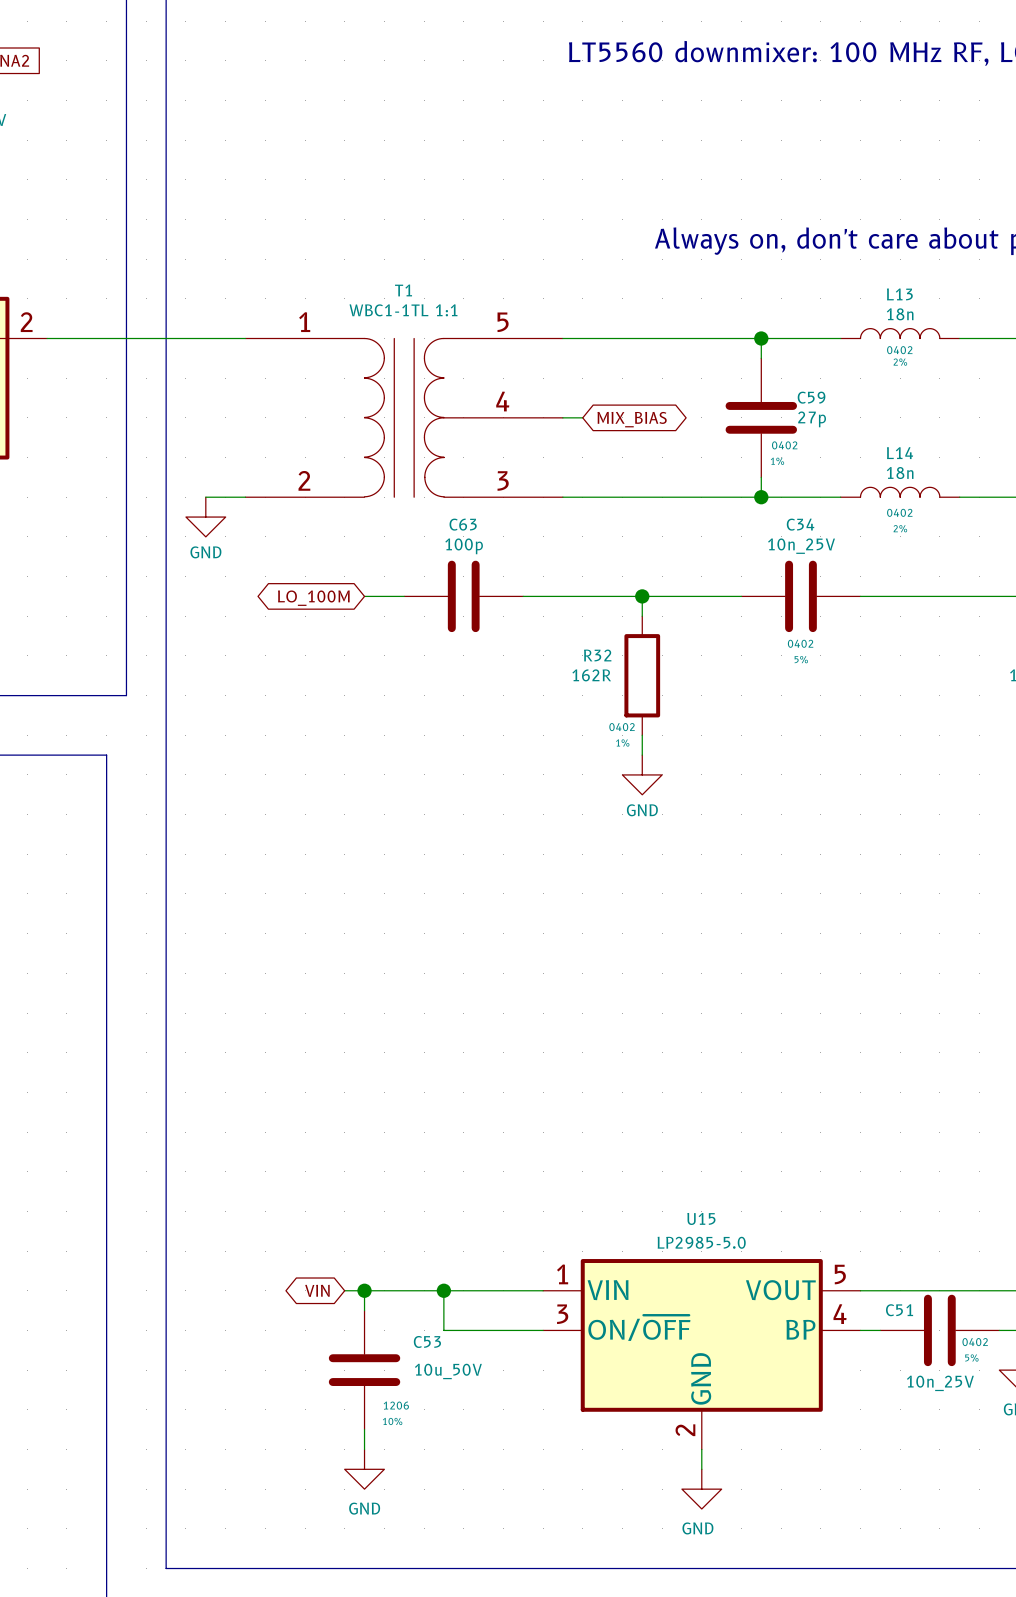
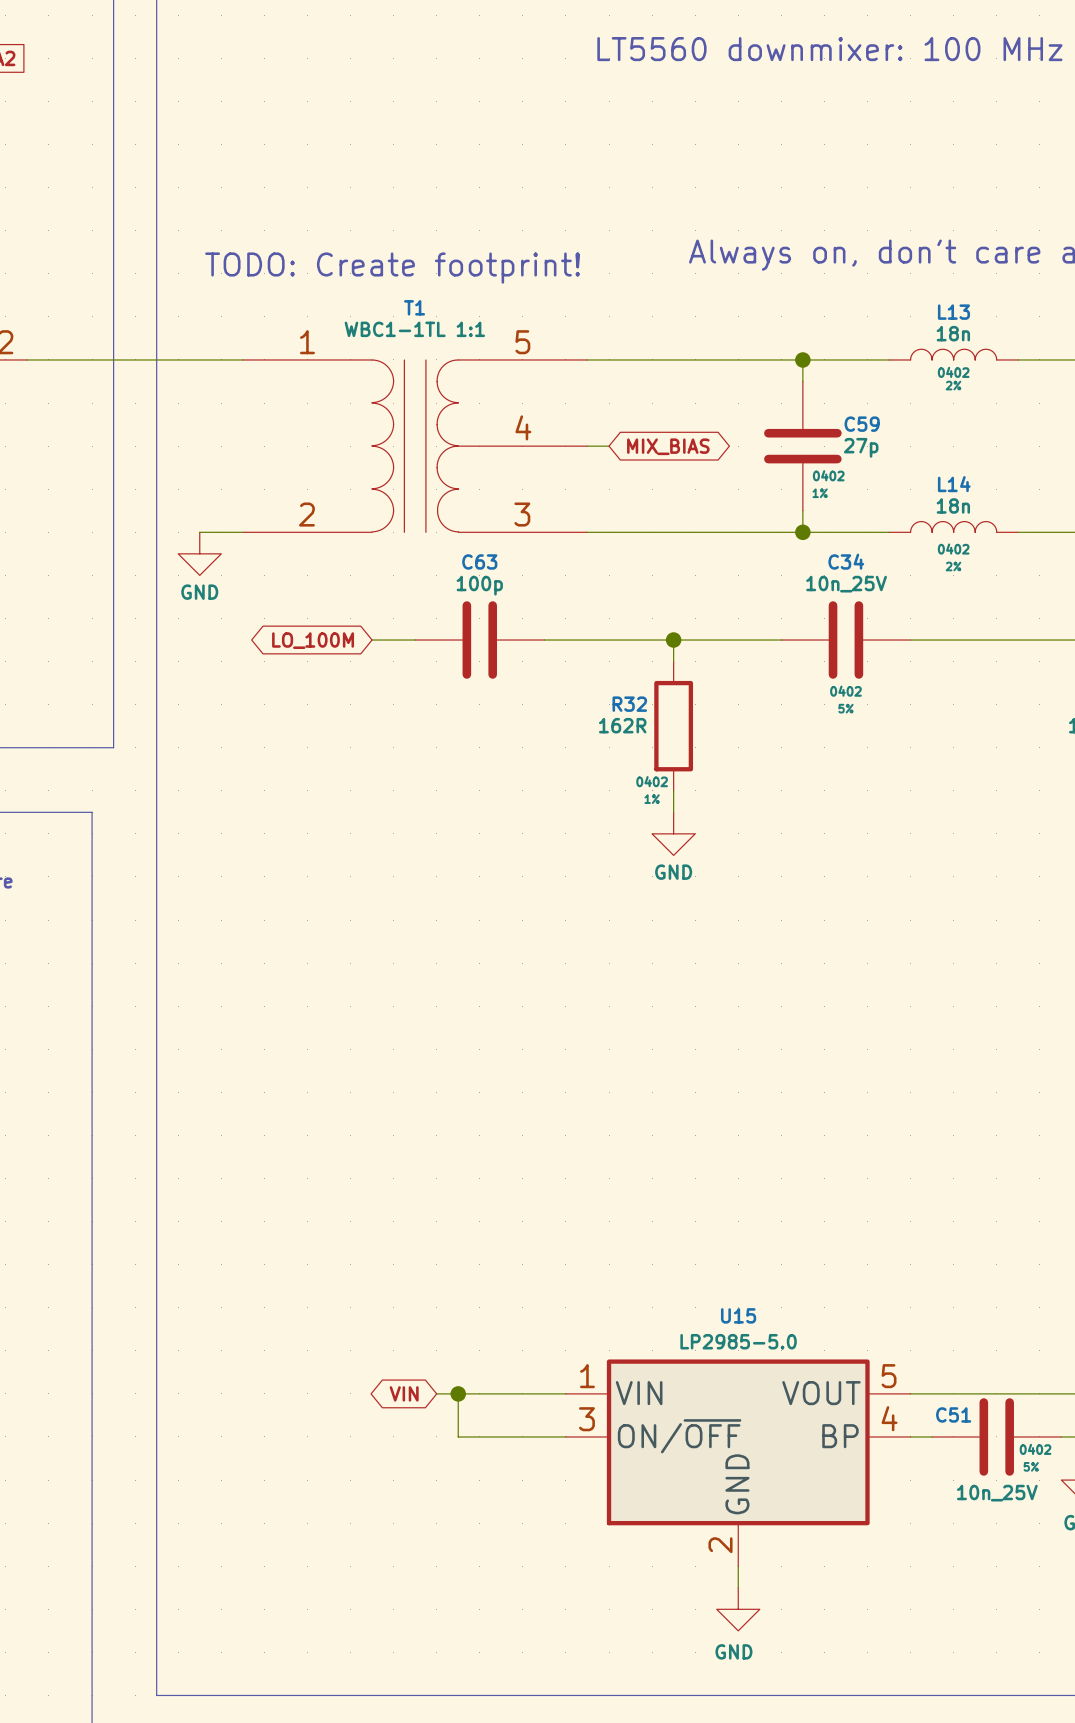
text: none -> TODO: Create footprint! (392, 268)
global label position: VIN (317, 1290) -> VIN (404, 1393)
wire: (344, 1290) (424, 1290) -> none
wire: (364, 1290) (364, 1310) -> none
junction: (364, 1290) -> none
C53: 10u_50V (364, 1370) -> none
wire: (364, 1429) (364, 1449) -> none
power symbol: GND (364, 1469) -> none

